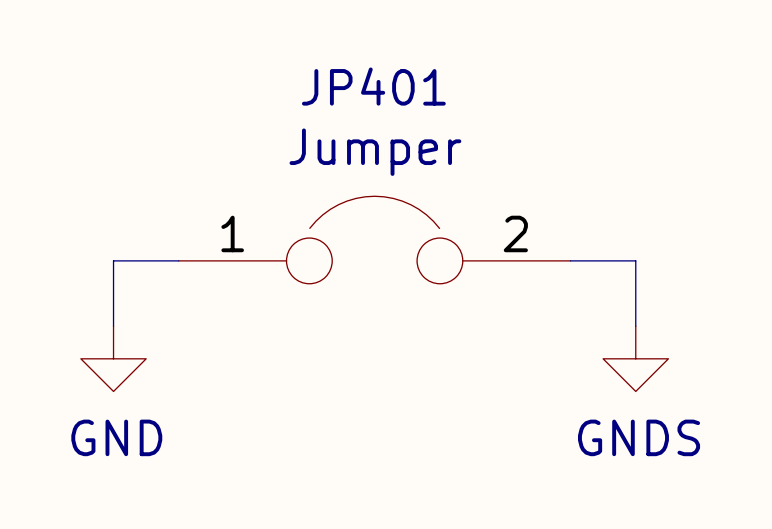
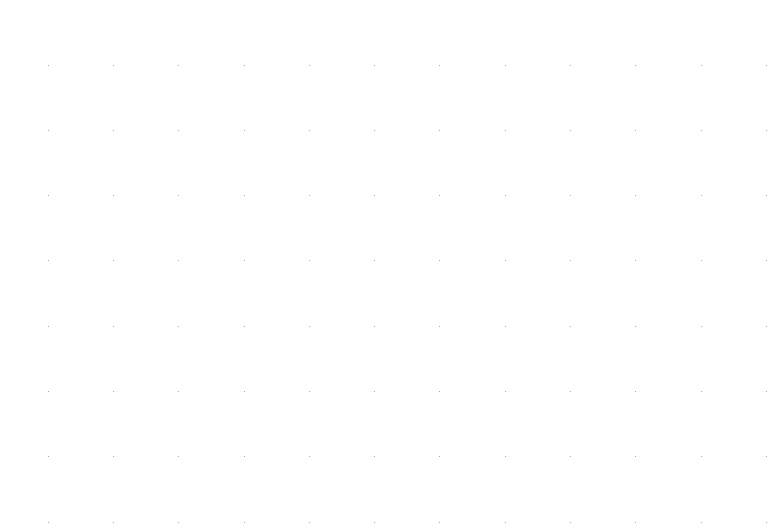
JP401: Jumper (374, 240) -> none
wire: (178, 260) (113, 260) (113, 326) -> none
wire: (570, 260) (635, 260) (635, 326) -> none
power symbol: GND (113, 358) -> none
power symbol: GNDS (635, 358) -> none

